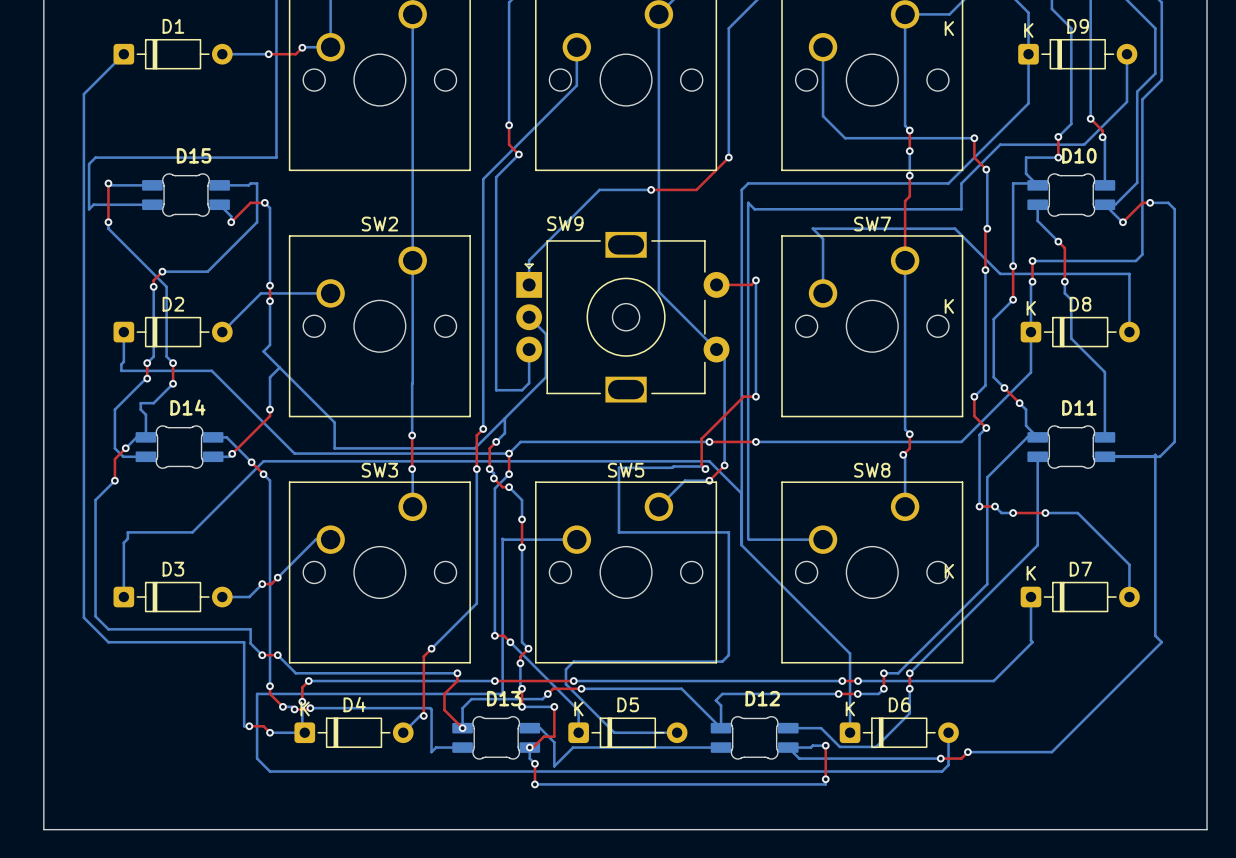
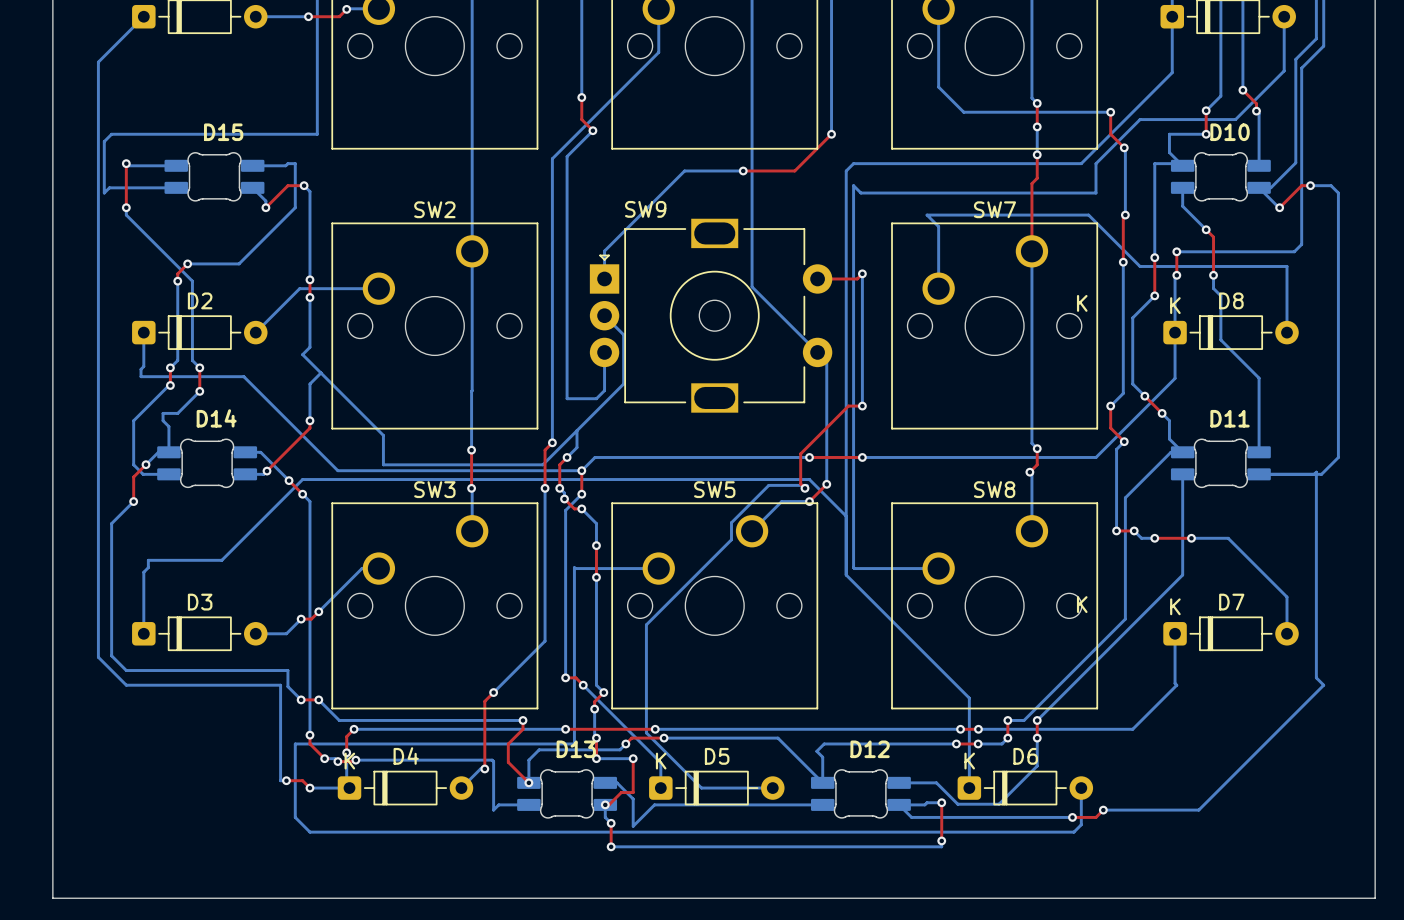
bottom track: (672, 467) (618, 467) (618, 532) (728, 532) (728, 655) (722, 661) (573, 661) (565, 669) -> (767, 486) (731, 522) (731, 539) (646, 624) (646, 716)

